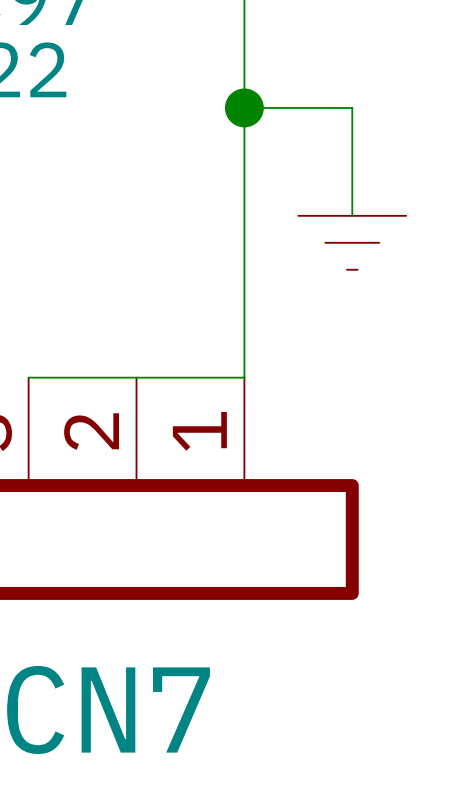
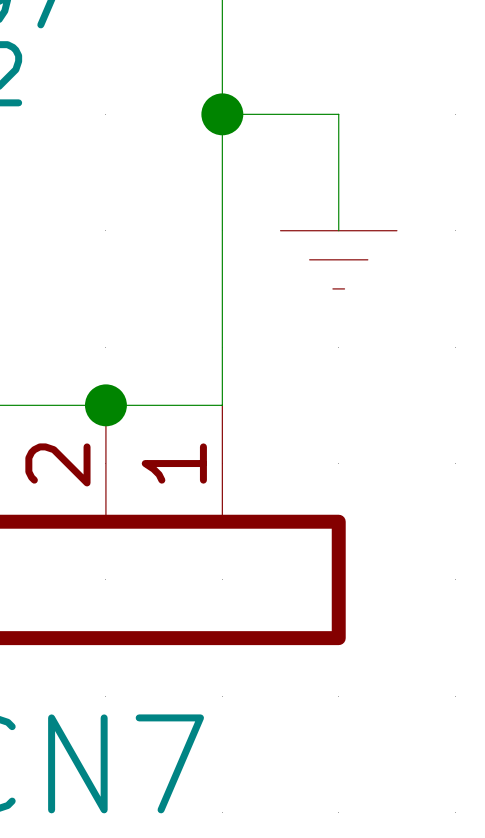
junction: none -> (105, 405)

